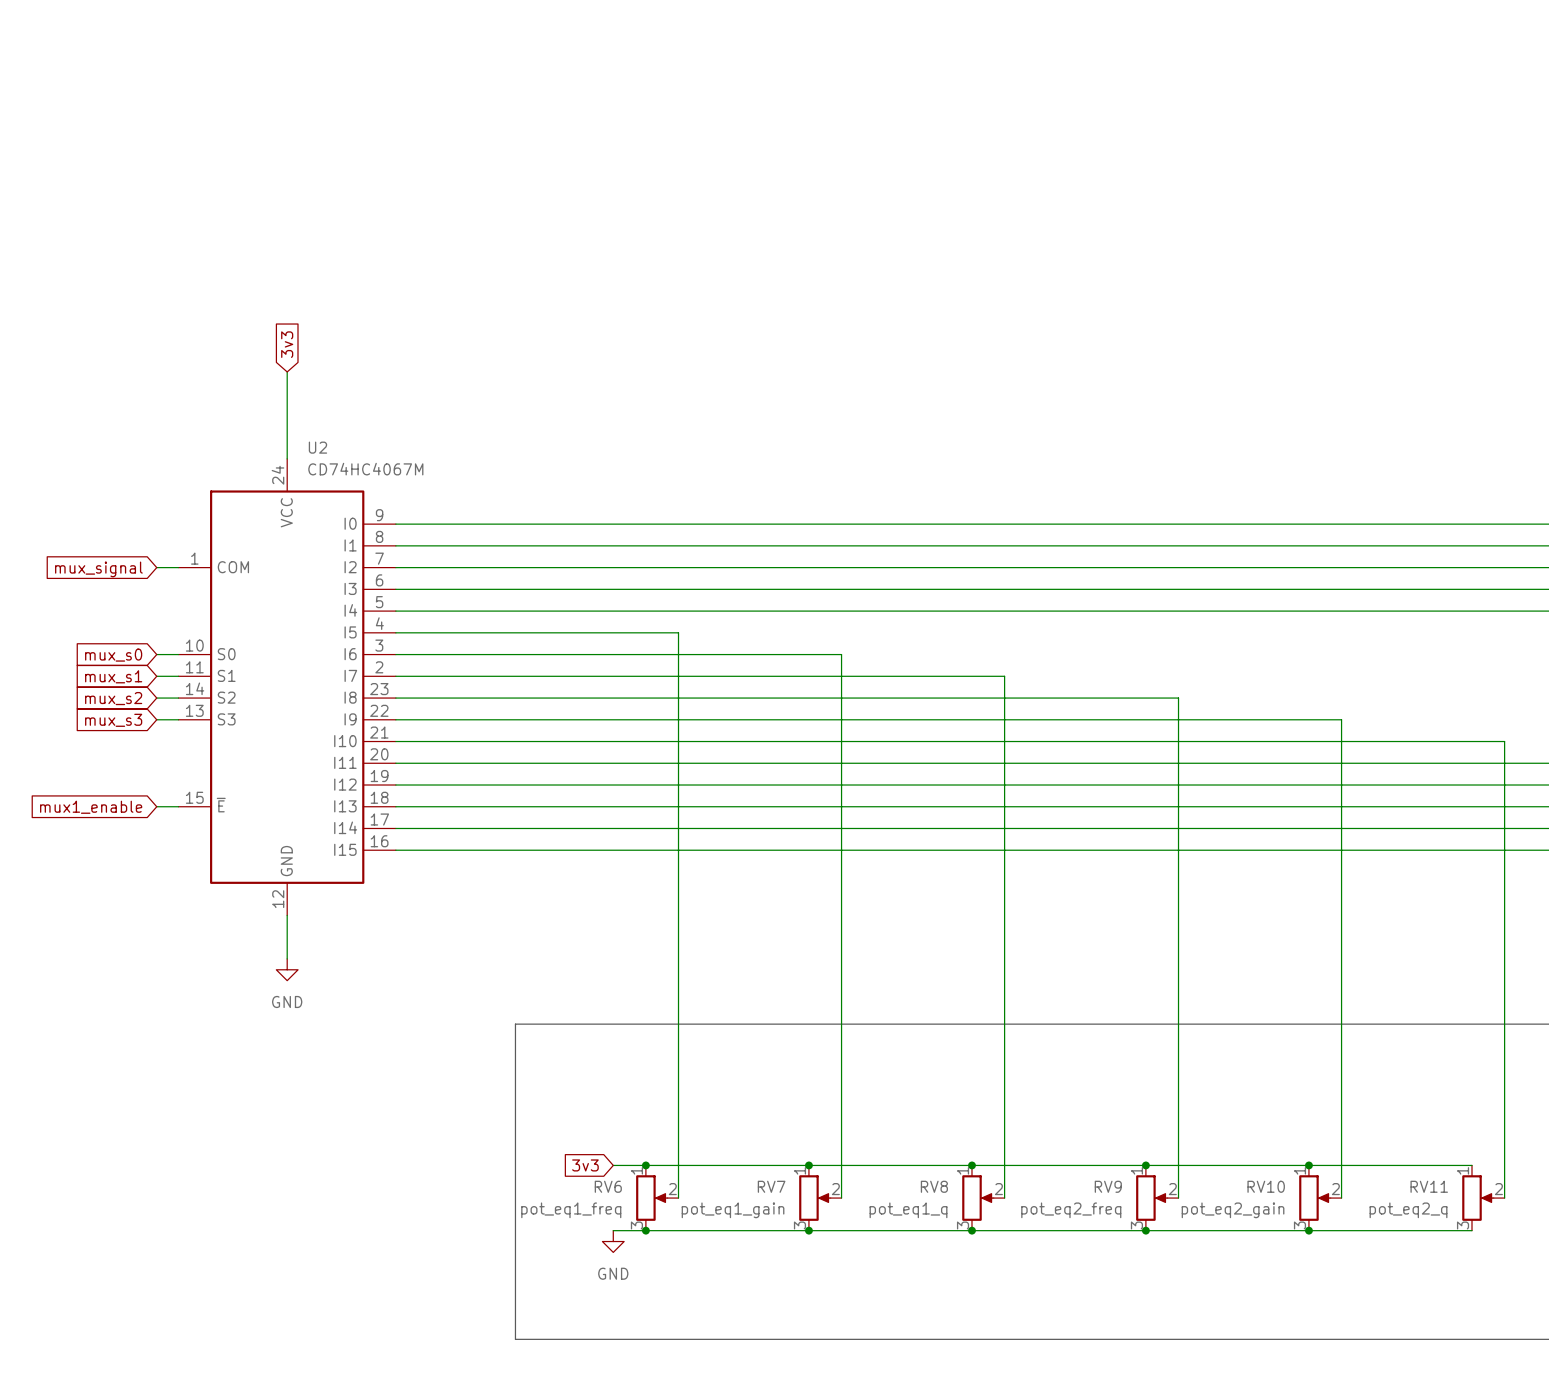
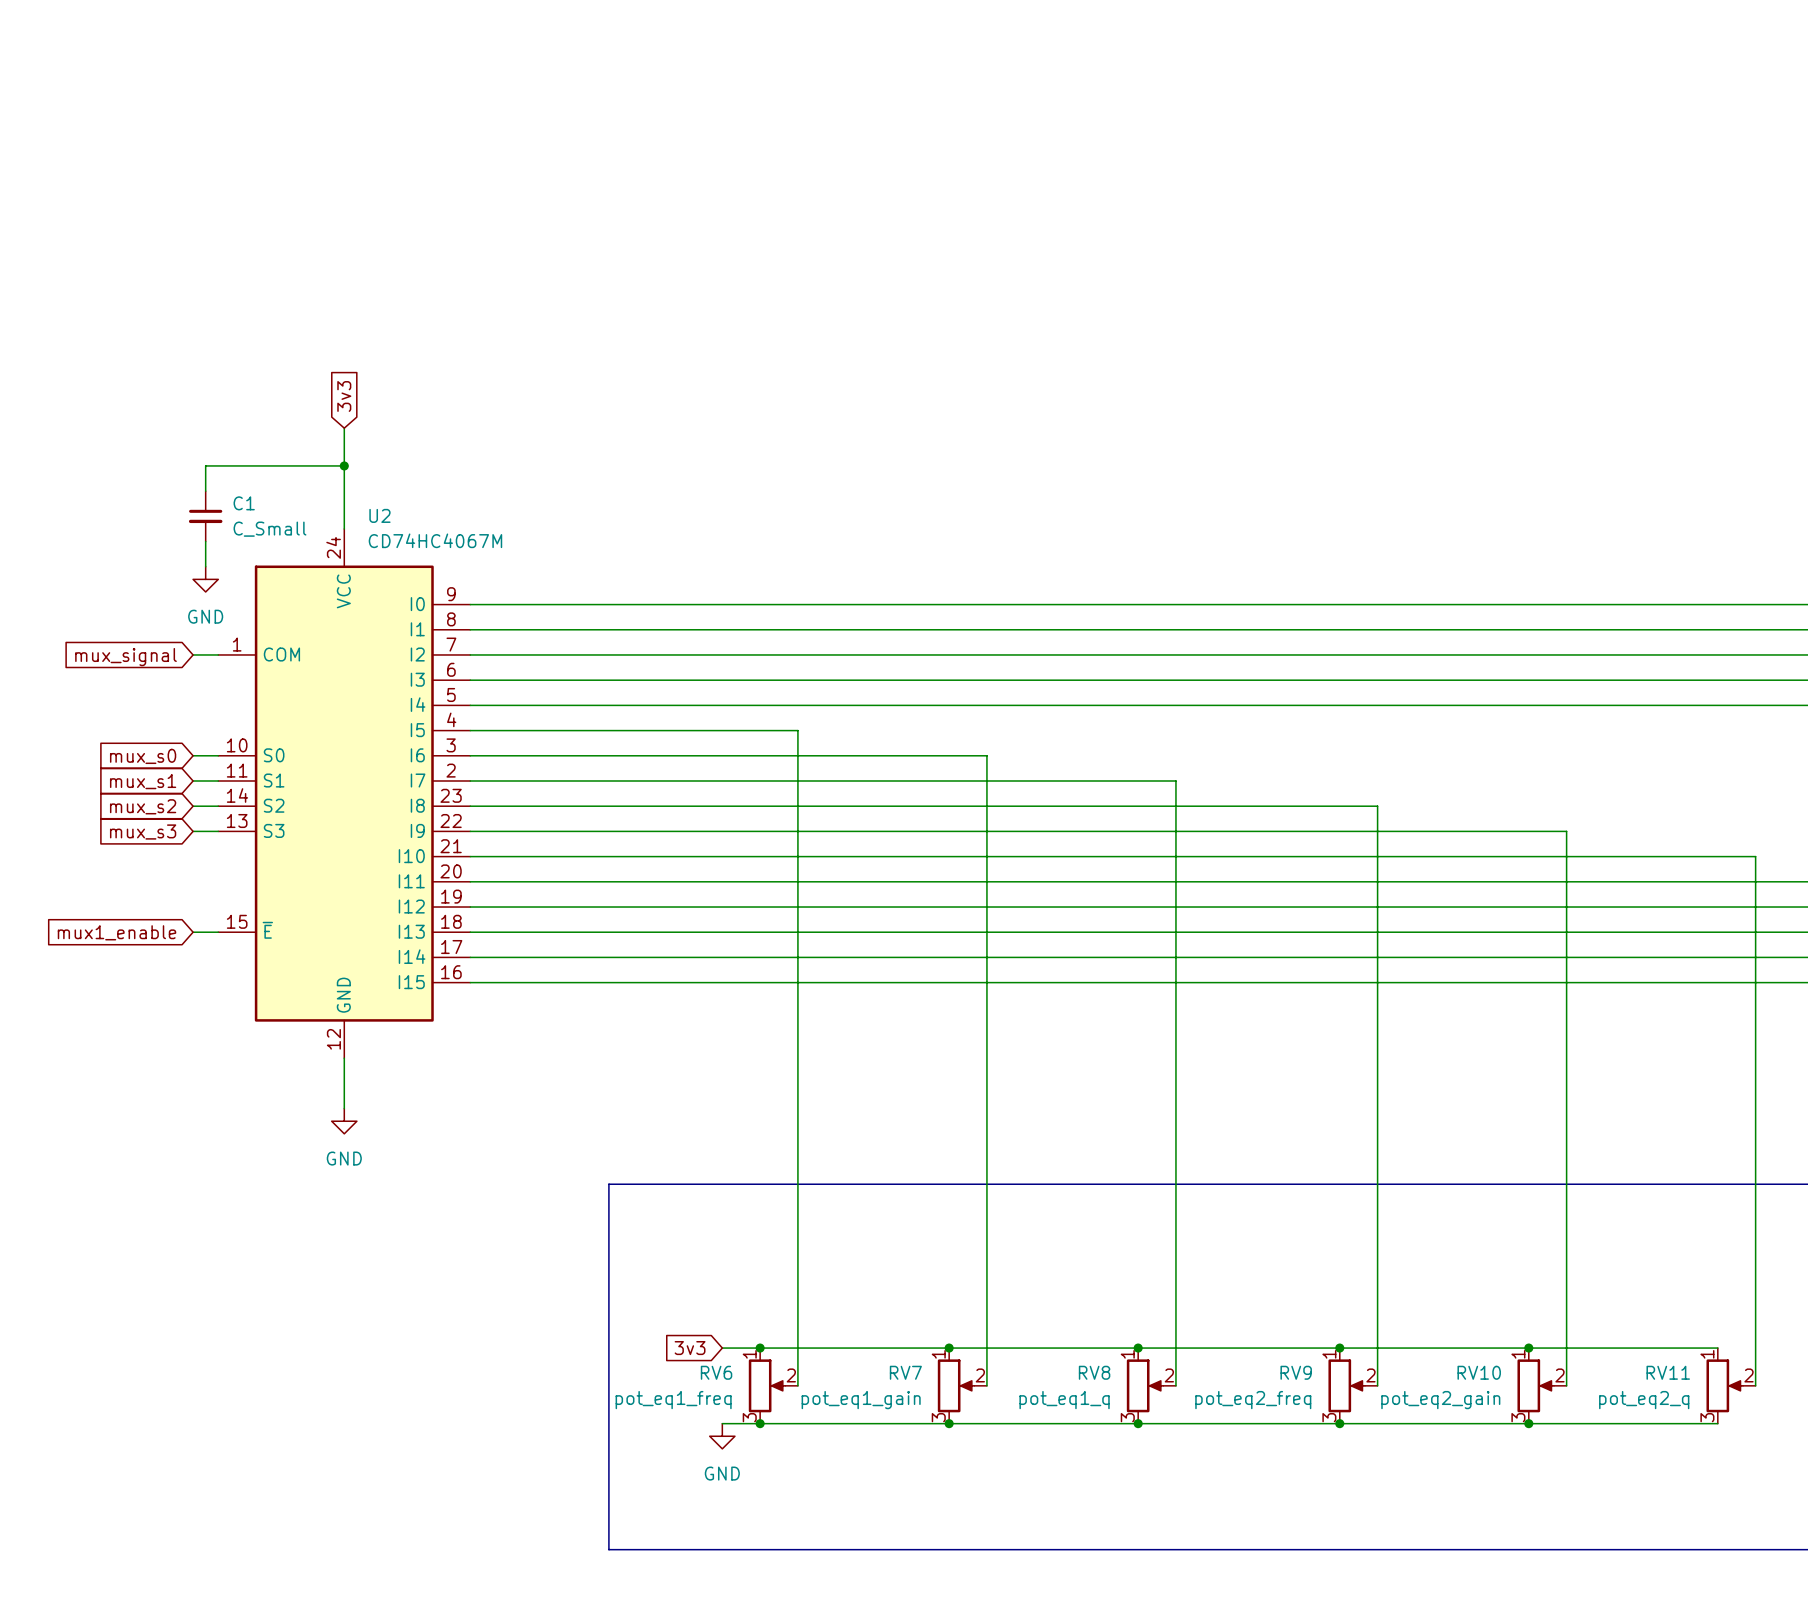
wire: none -> (344, 465) (205, 465) (205, 491)
junction: none -> (344, 465)
C1: none -> C_Small (205, 516)
wire: none -> (205, 541) (205, 566)
power symbol: none -> GND (205, 579)

